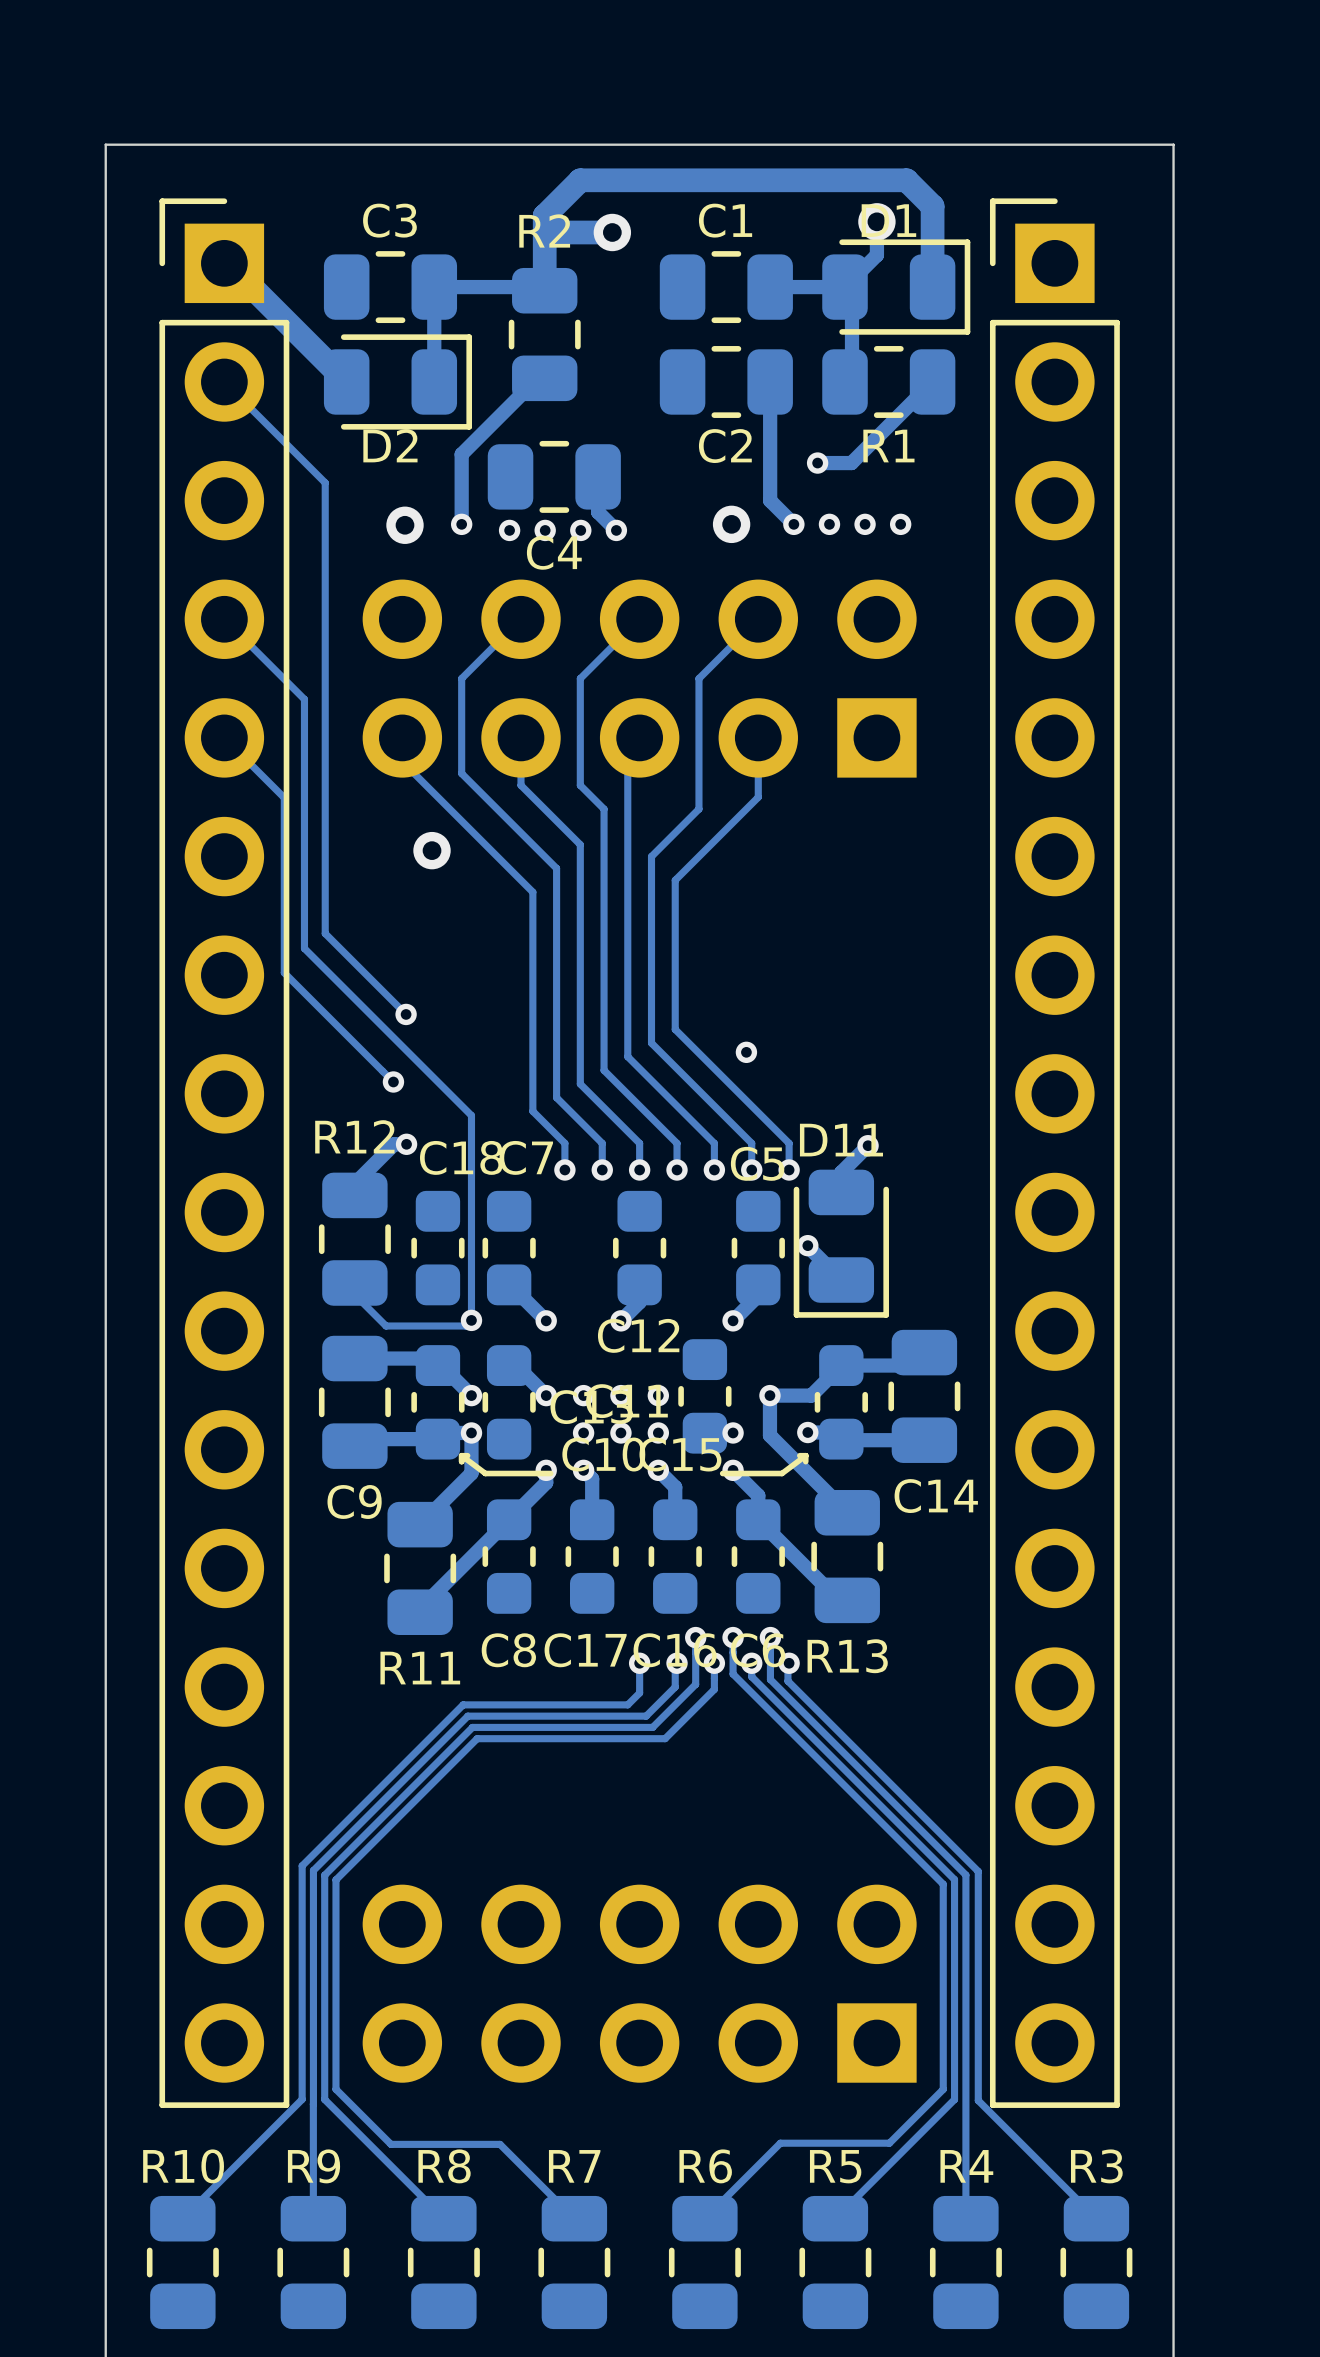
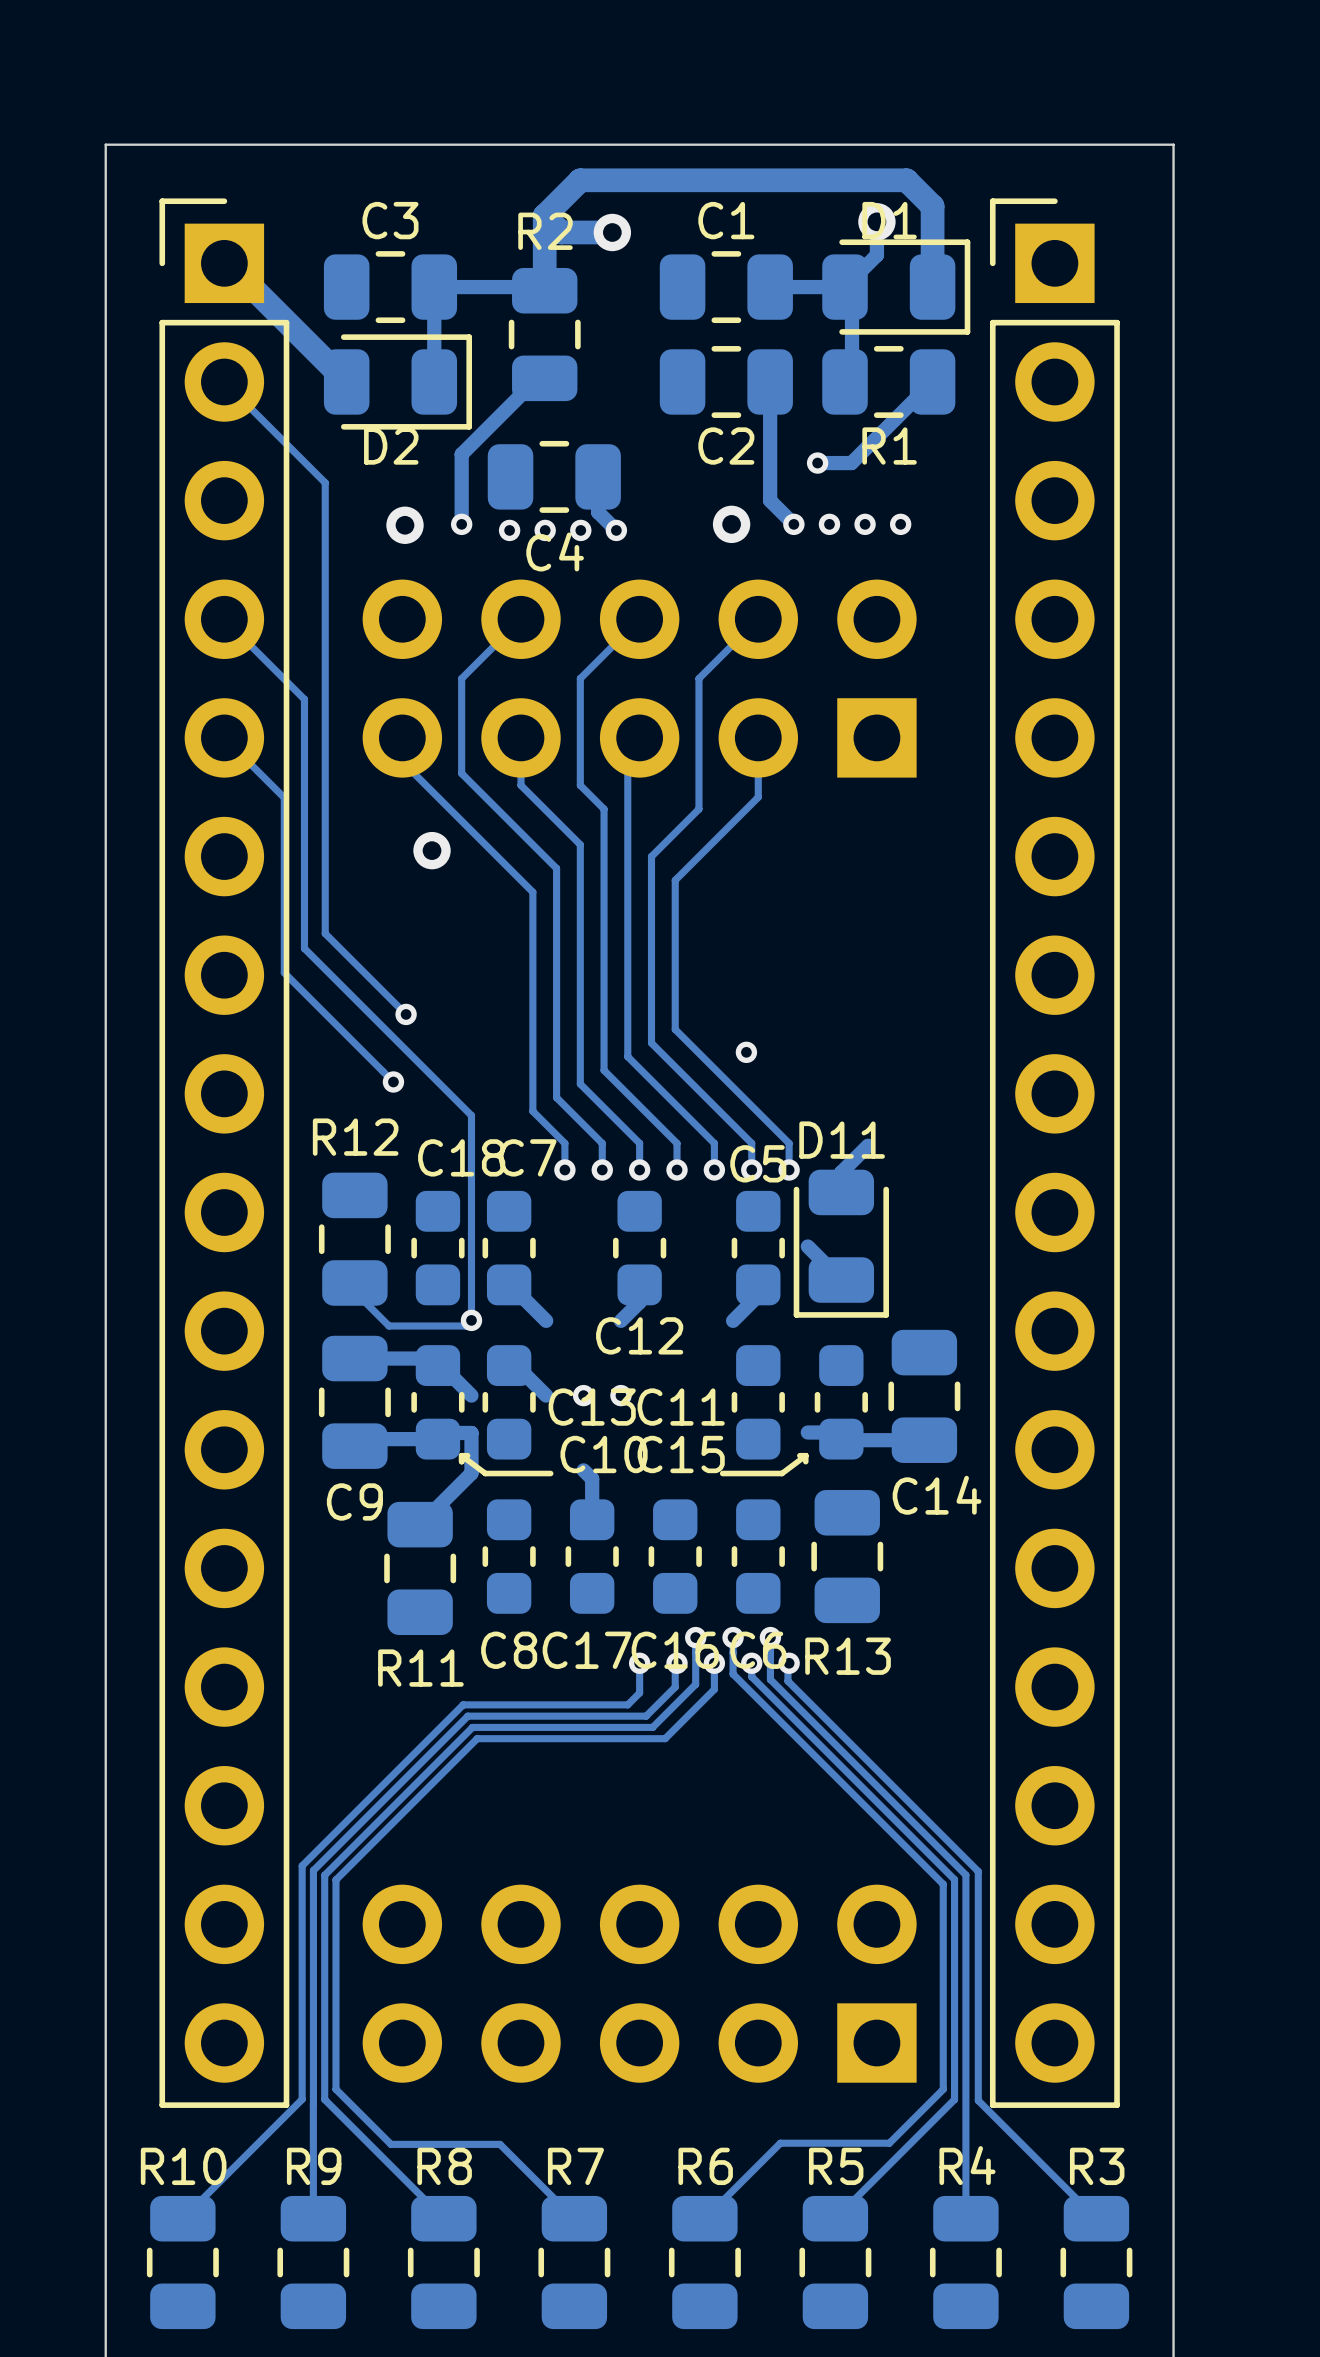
track: (406, 1144) (394, 1144) (343, 1195) -> none
via: (406, 1144) -> none
via: (868, 1145) -> none
via: (807, 1245) -> none
track: (343, 1282) (386, 1326) (389, 1326) -> (354, 1291) (389, 1326)
via: (546, 1320) -> none
via: (620, 1320) -> none
via: (733, 1320) -> none
track: (924, 1352) (911, 1365) (841, 1365) (811, 1395) (769, 1395) (769, 1435) (847, 1512) -> none
via: (471, 1395) -> none
via: (546, 1395) -> none
via: (658, 1395) -> none
via: (769, 1395) -> none
C11 position: (704, 1396) -> (758, 1402)
via: (471, 1432) -> none
via: (583, 1432) -> none
via: (620, 1432) -> none
via: (658, 1432) -> none
via: (733, 1432) -> none
via: (807, 1432) -> none
track: (546, 1470) (546, 1482) (420, 1608) (420, 1612) -> none
via: (546, 1470) -> none
via: (583, 1470) -> none
track: (658, 1470) (675, 1487) (675, 1519) -> none
via: (658, 1470) -> none
track: (733, 1470) (758, 1495) (758, 1519) (838, 1600) (847, 1600) -> none
via: (733, 1470) -> none

